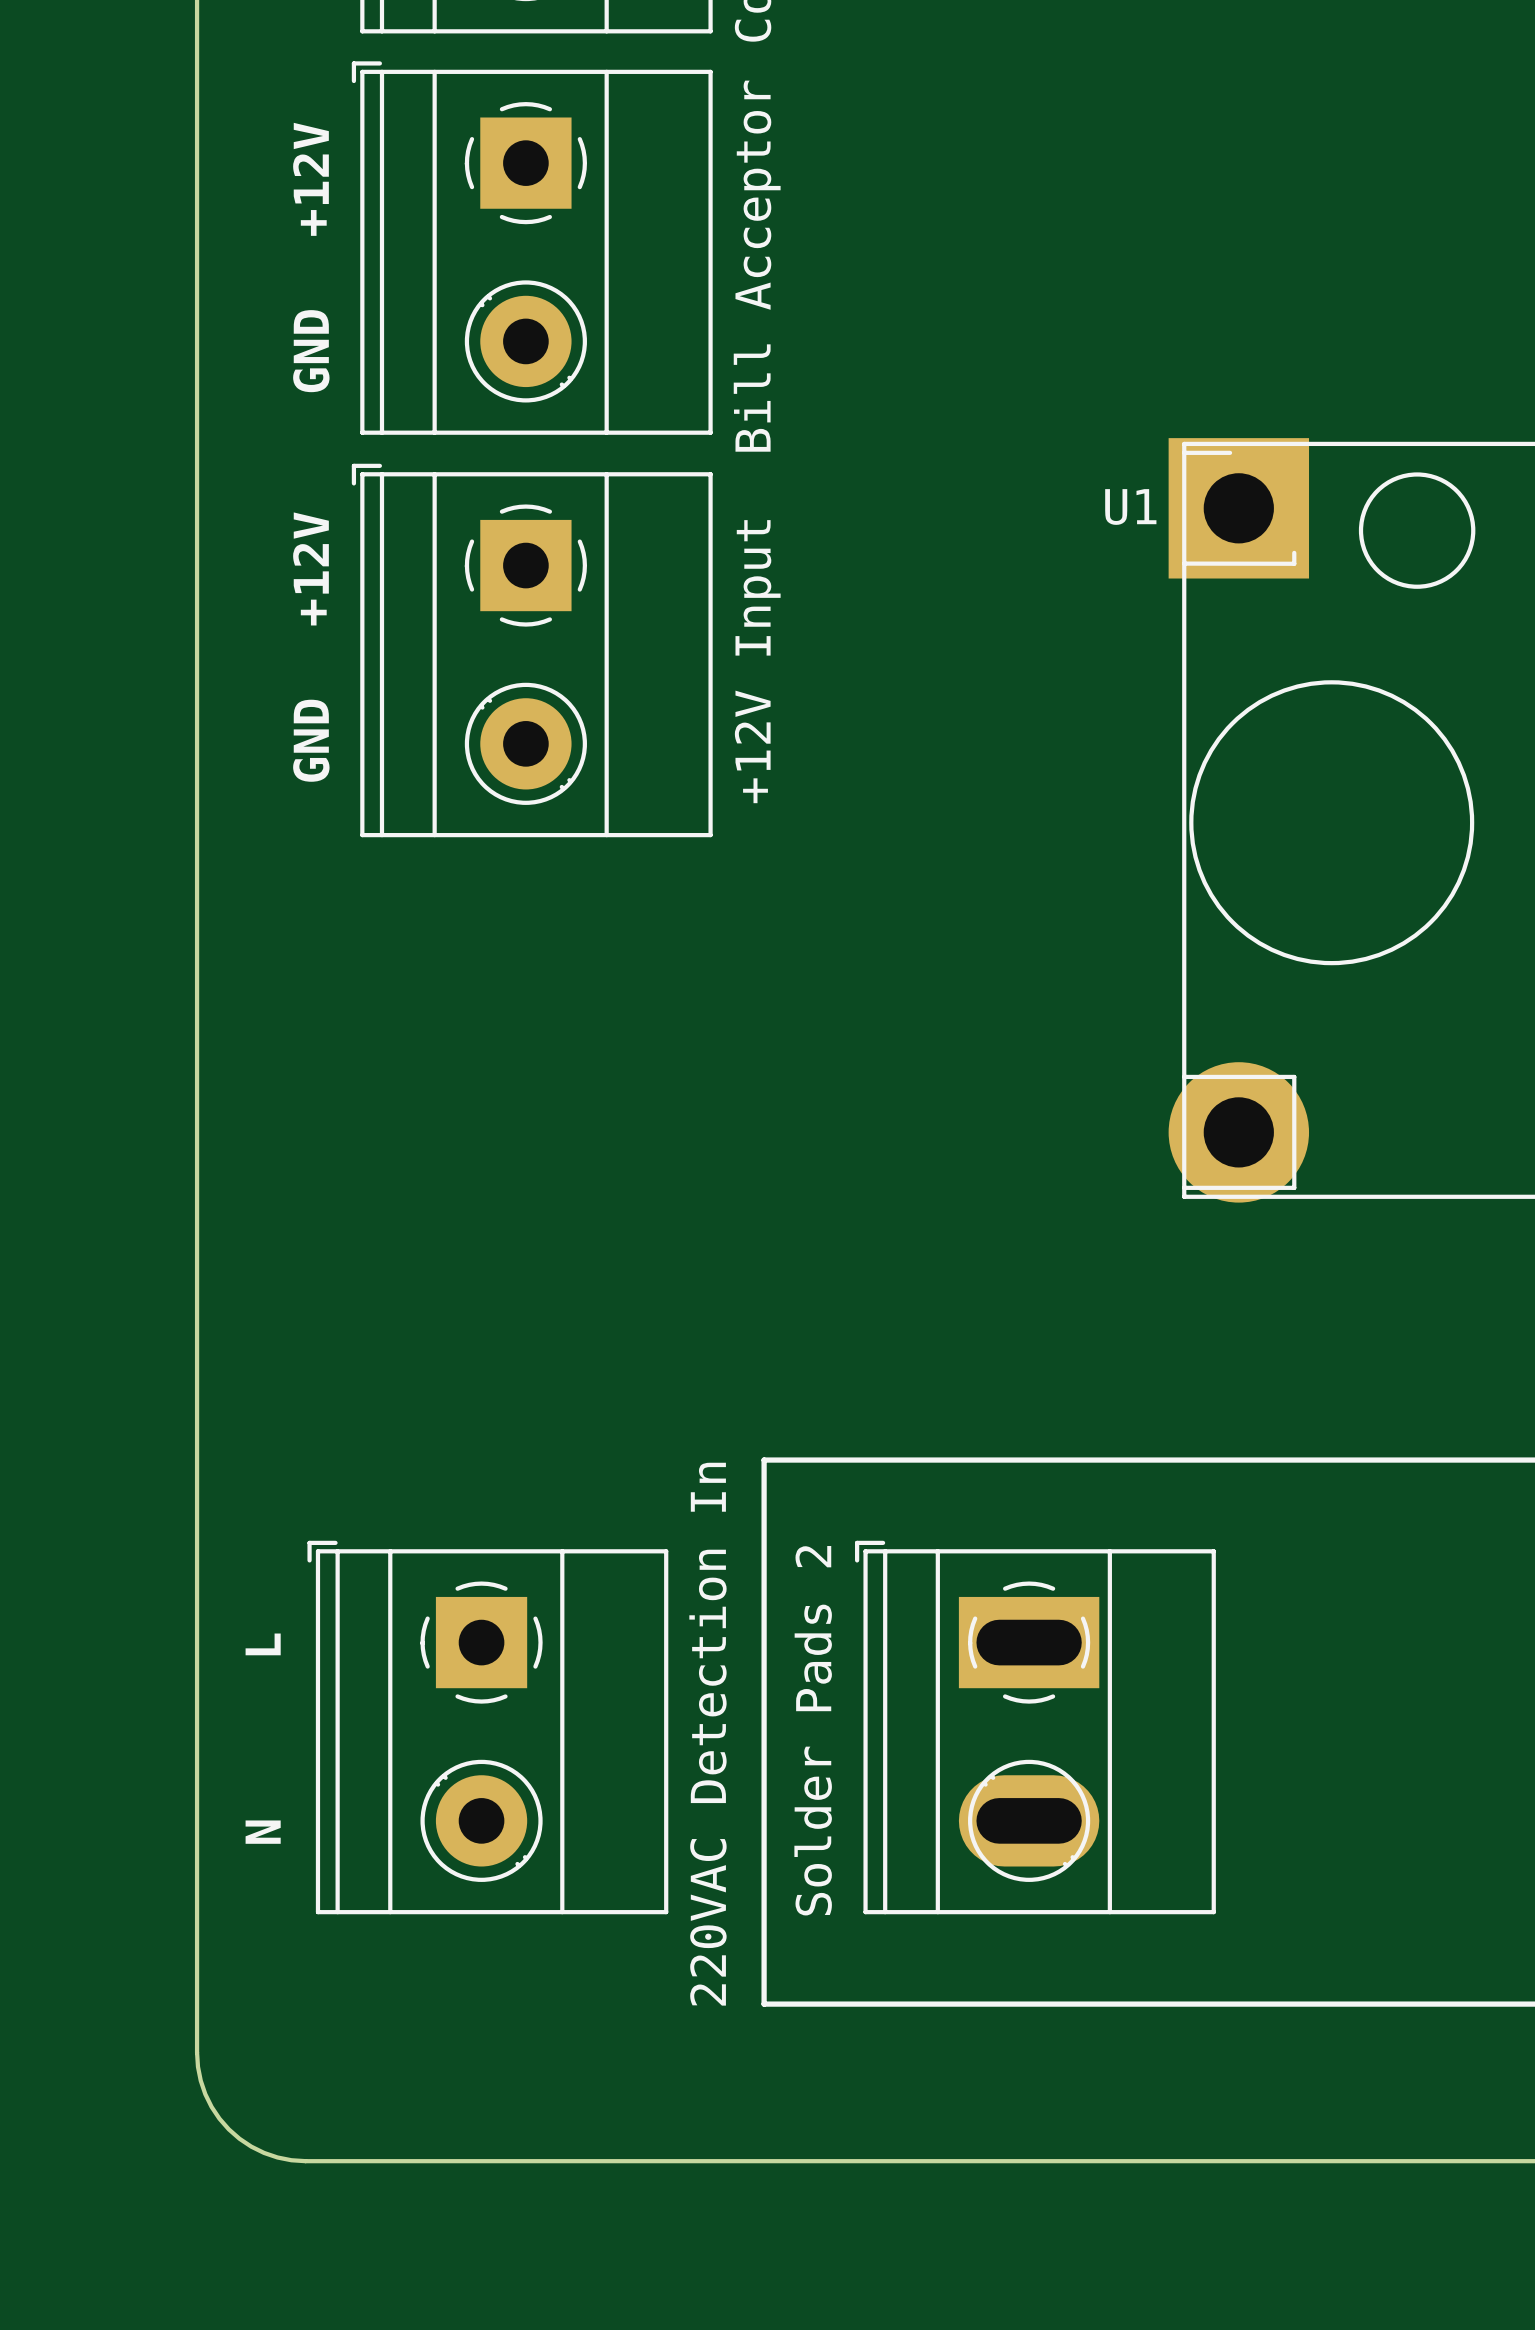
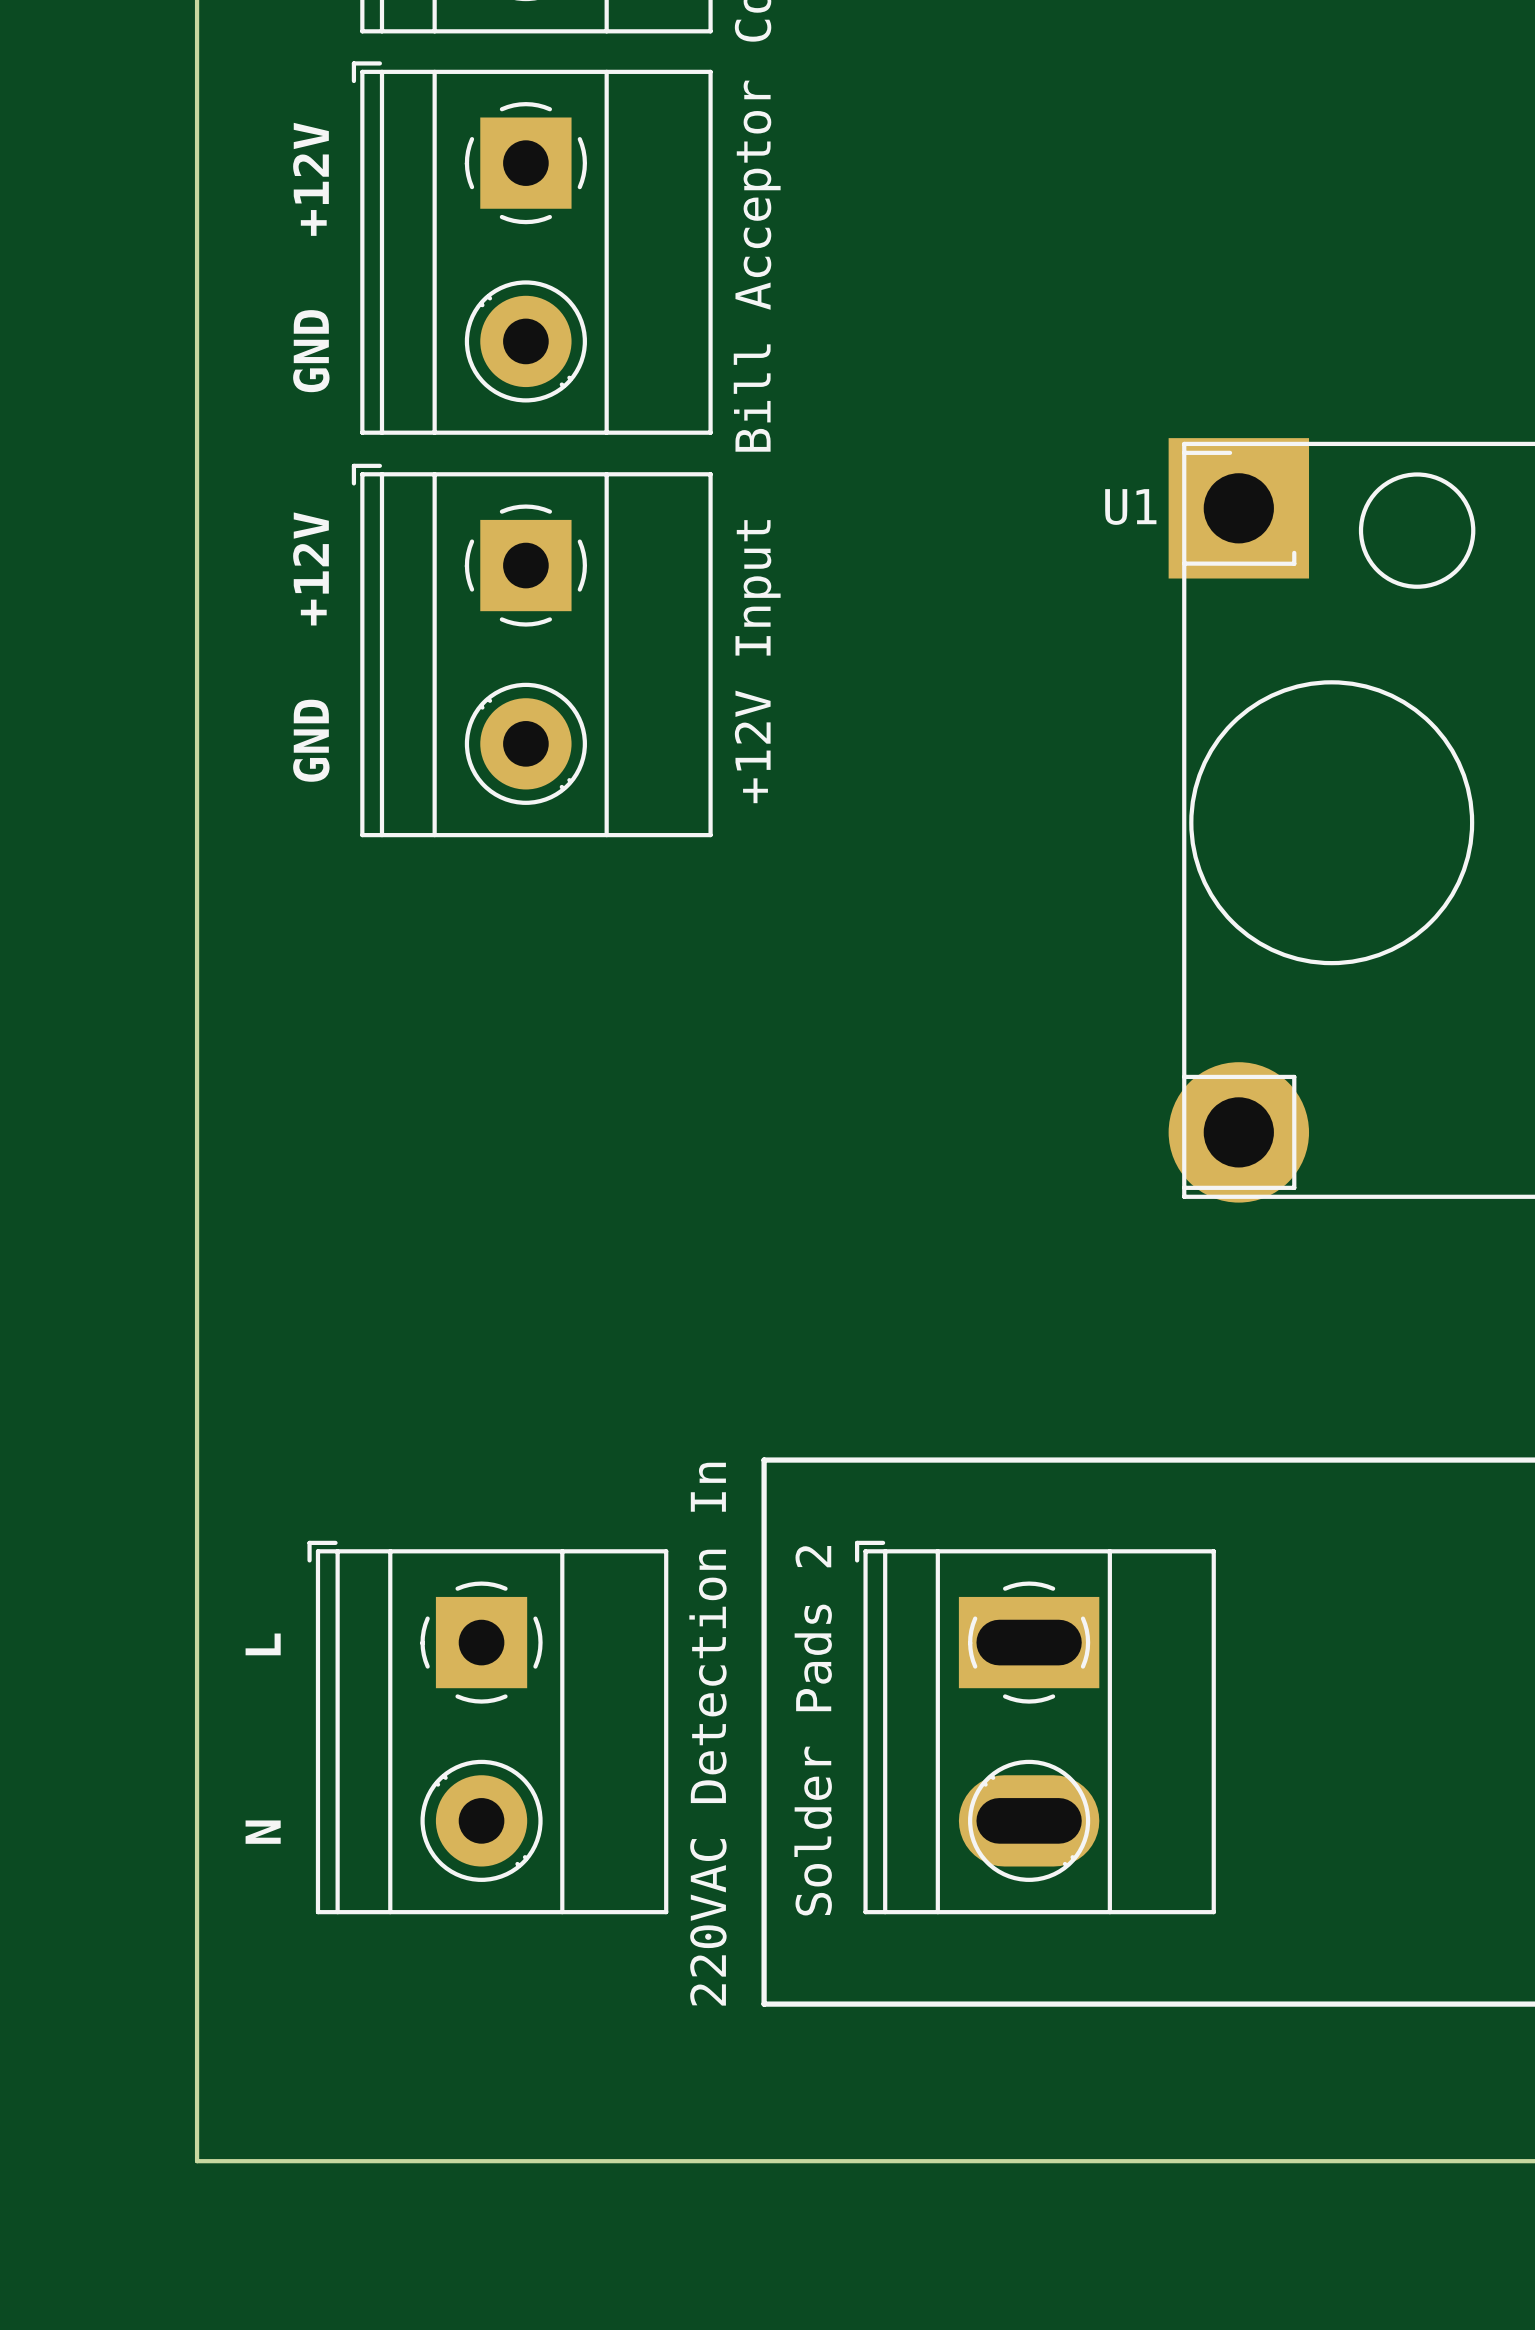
board edge: (197, 2052) (200, 2080) (205, 2094) (211, 2106) (228, 2129) (251, 2146) (264, 2152) (277, 2157) (305, 2161) -> (197, 2052) (197, 2161) (305, 2161)

